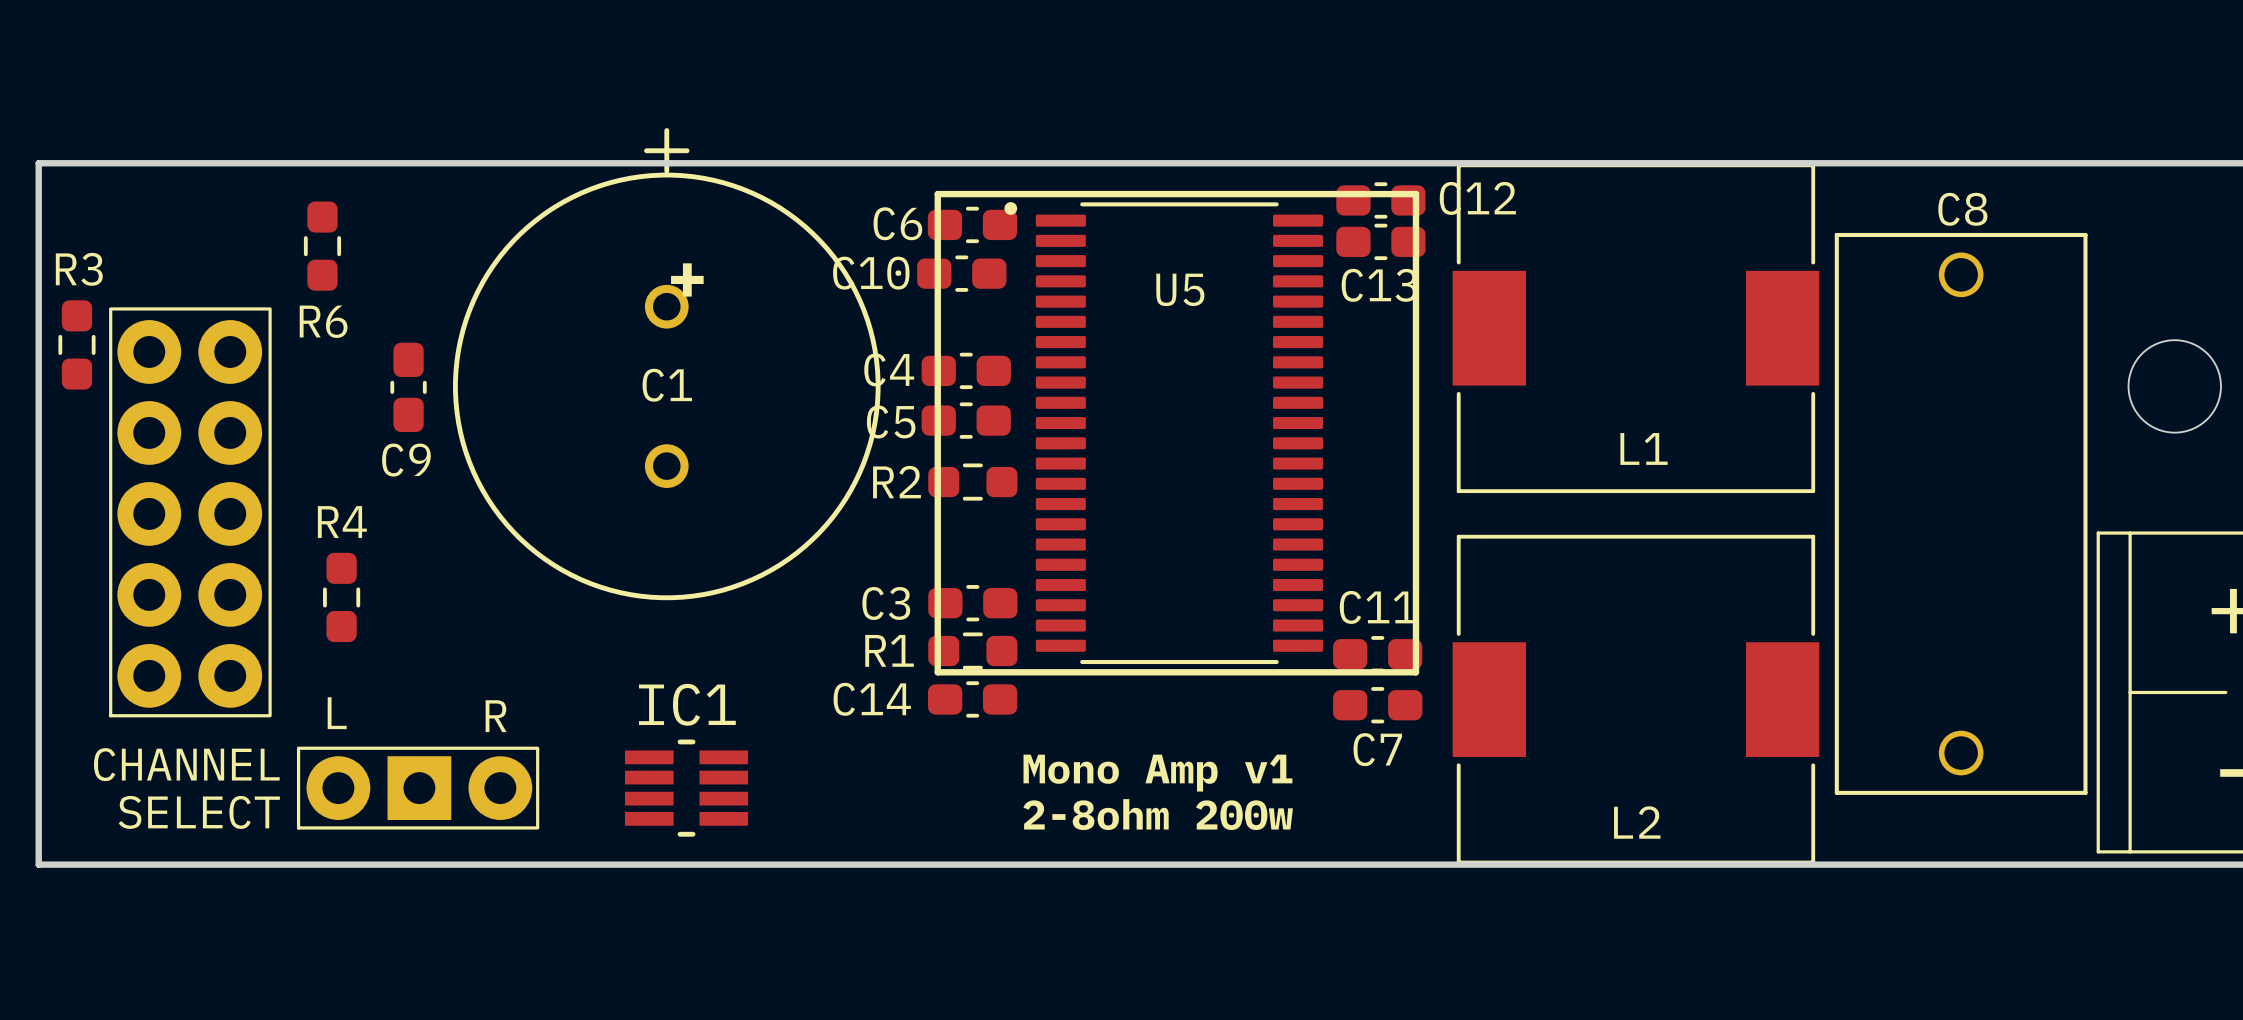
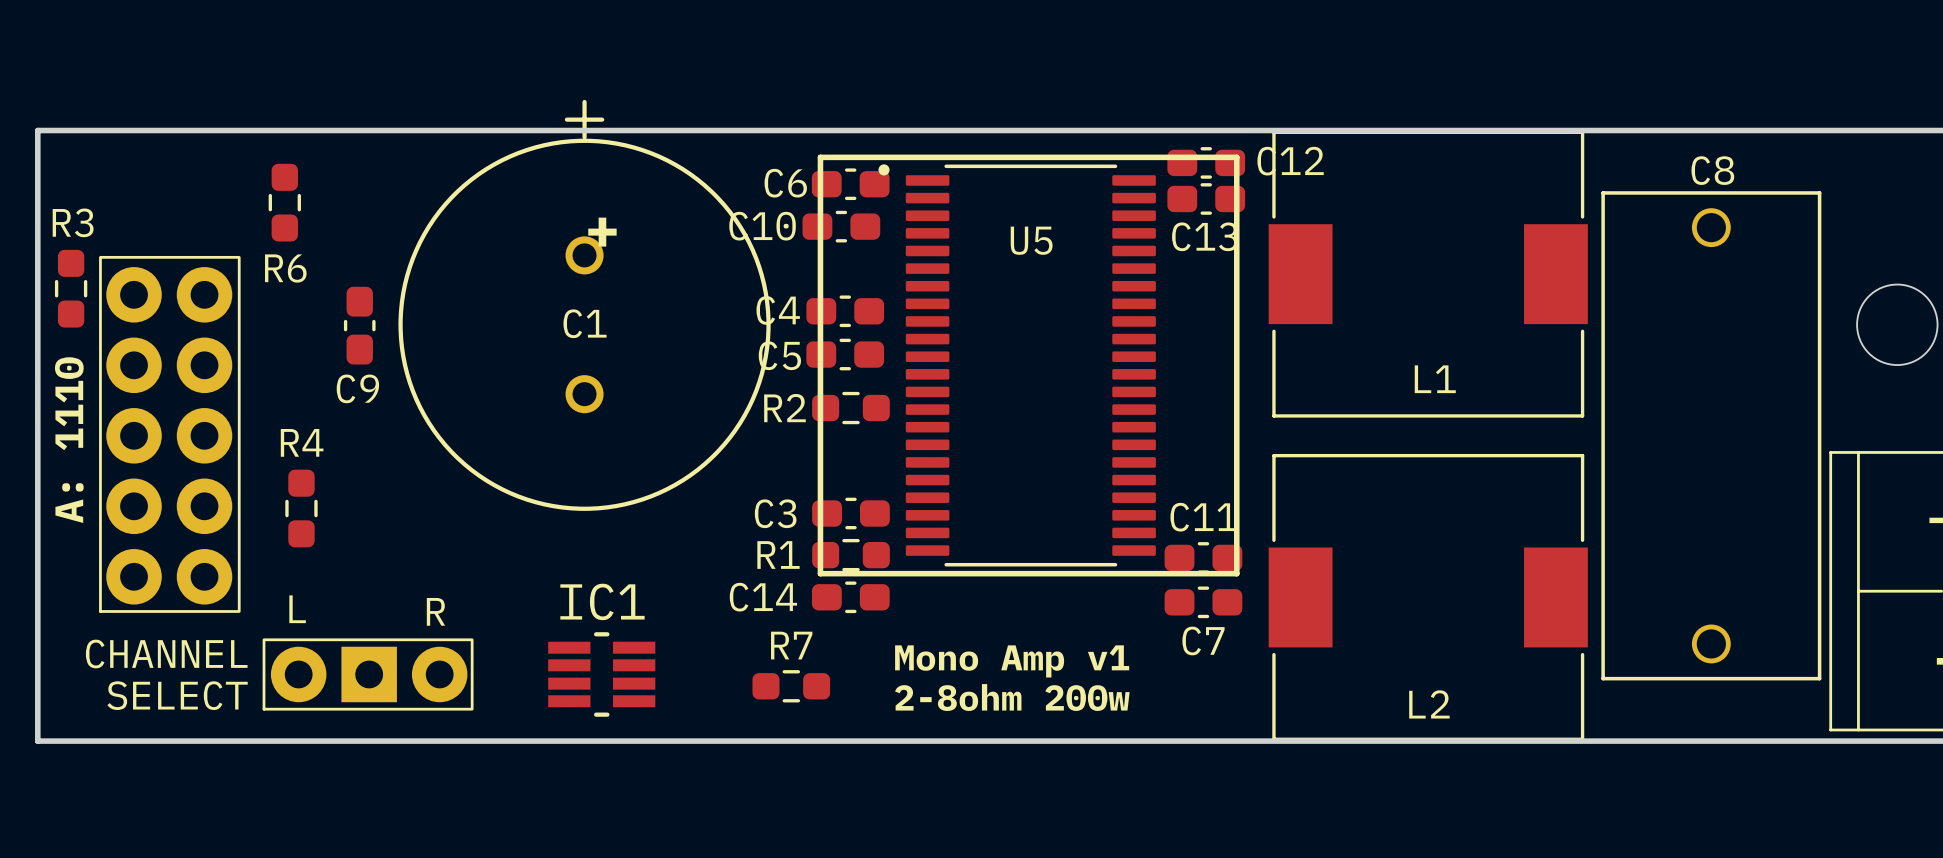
text: none -> A: 1110 (69, 440)
R7: none -> (791, 686)

